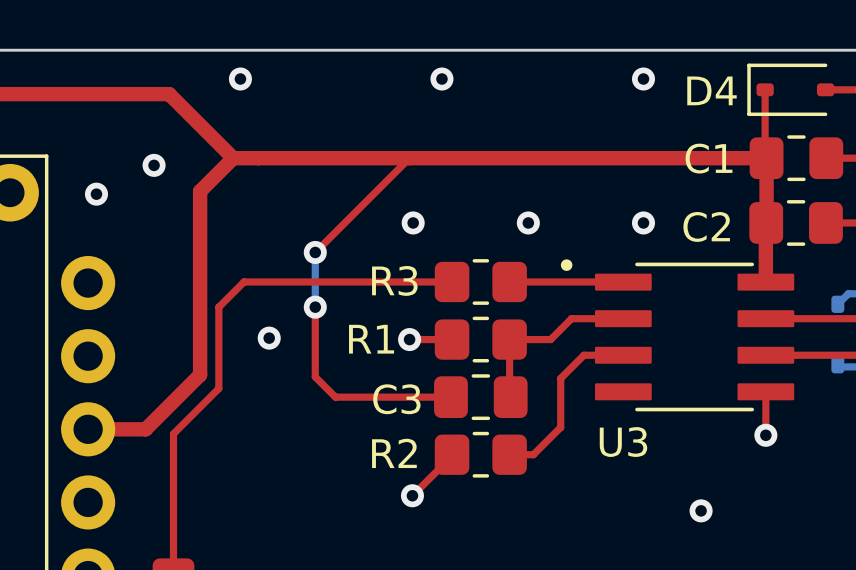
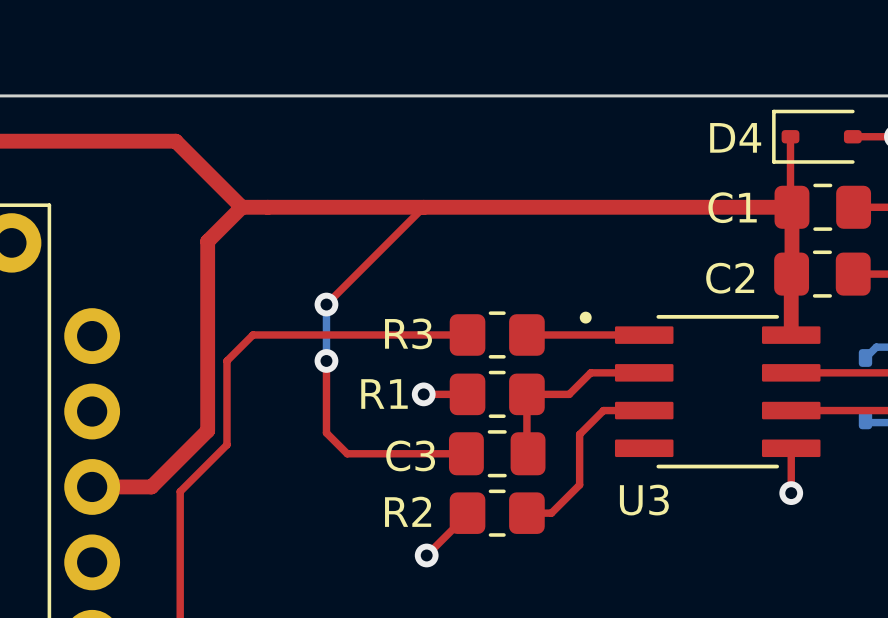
via: (240, 79) -> none
via: (441, 79) -> none
via: (643, 79) -> none
via: (154, 165) -> none
via: (96, 194) -> none
via: (413, 222) -> none
via: (528, 222) -> none
via: (643, 222) -> none
via: (269, 338) -> none
via: (701, 510) -> none

